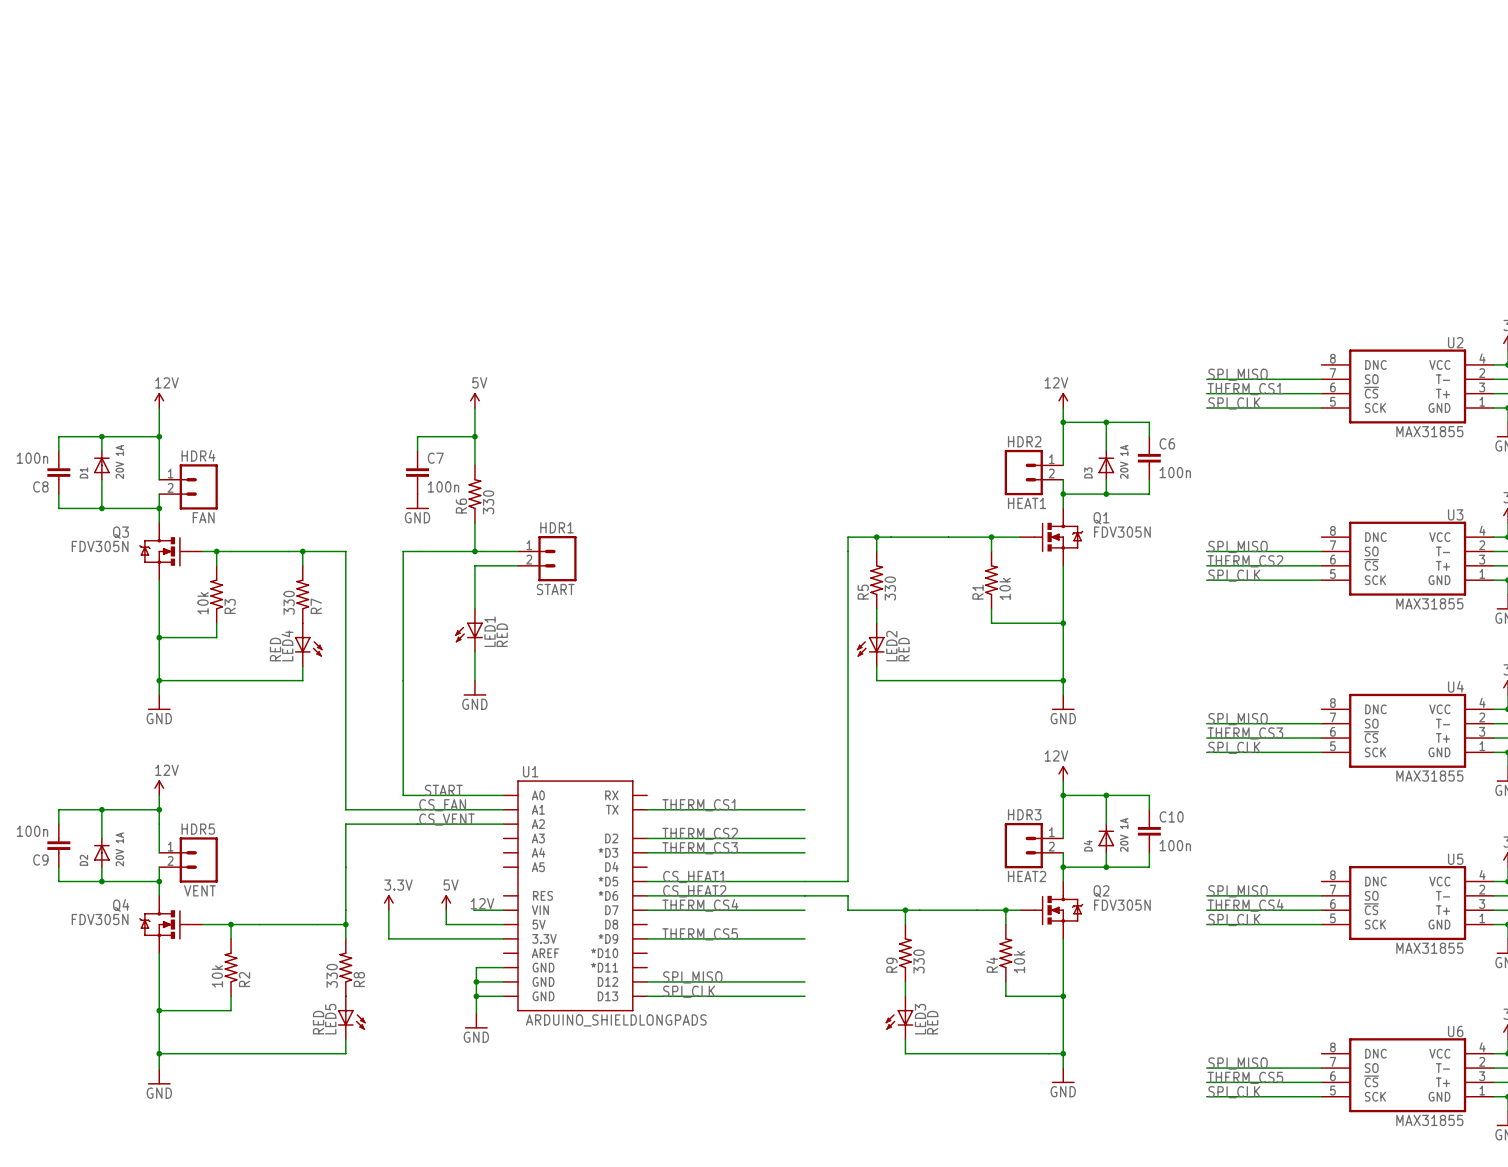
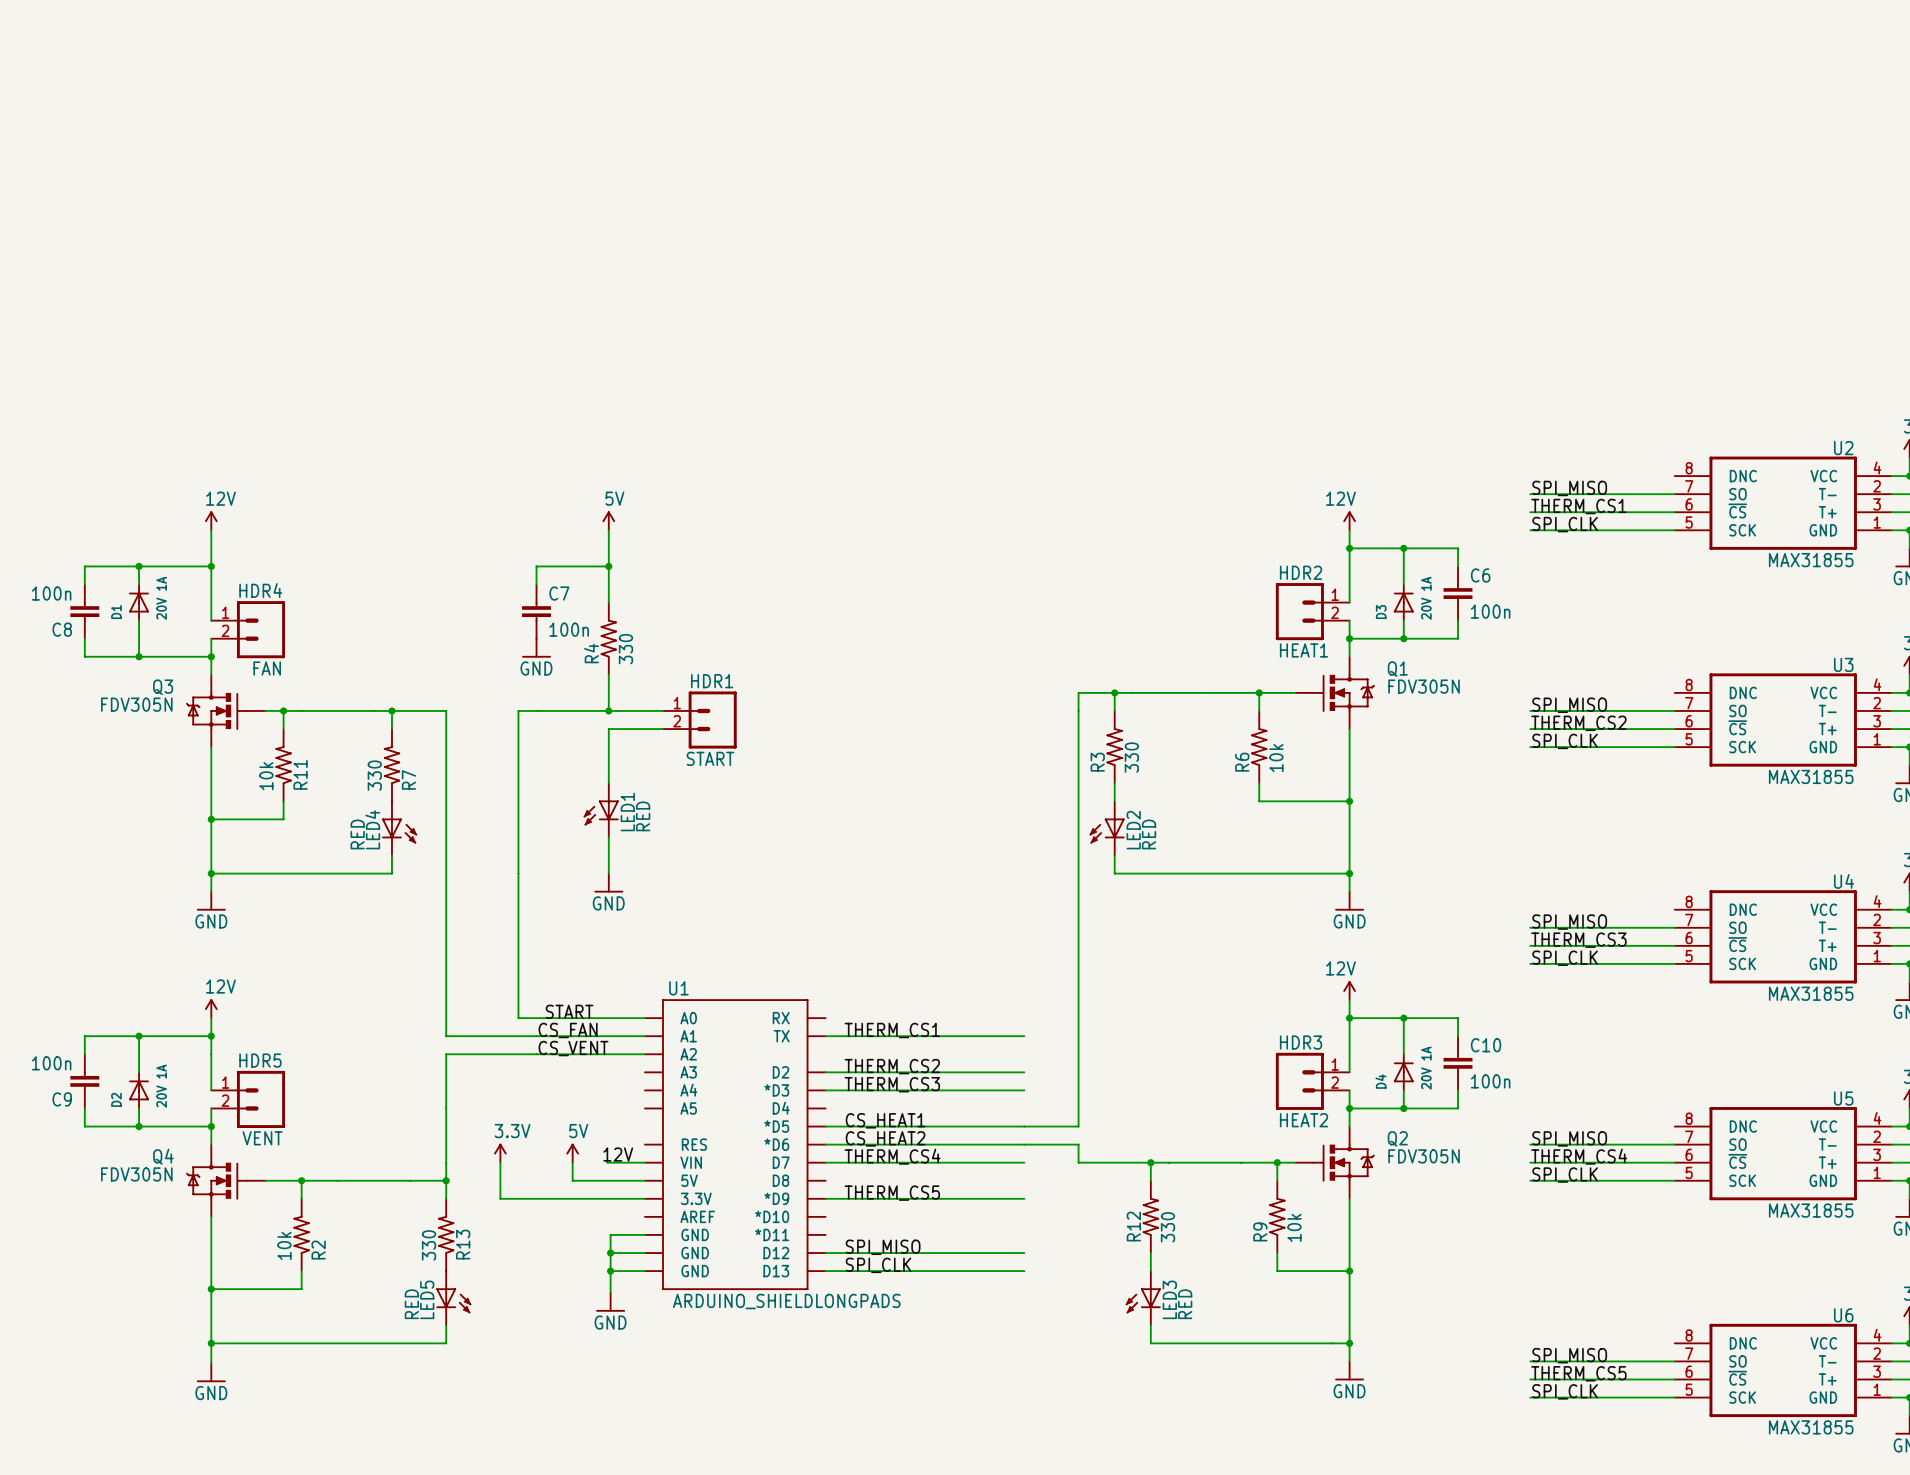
R6 name: R6 (461, 506) -> R4 (591, 653)
R5 name: R5 (863, 592) -> R3 (1097, 762)
R1 name: R1 (978, 592) -> R6 (1242, 762)
R3 name: R3 (230, 606) -> R11 (300, 774)
R4 name: R4 (992, 964) -> R9 (1260, 1231)
R9 name: R9 (891, 965) -> R12 (1133, 1226)
R8 name: R8 (359, 979) -> R13 (463, 1244)

